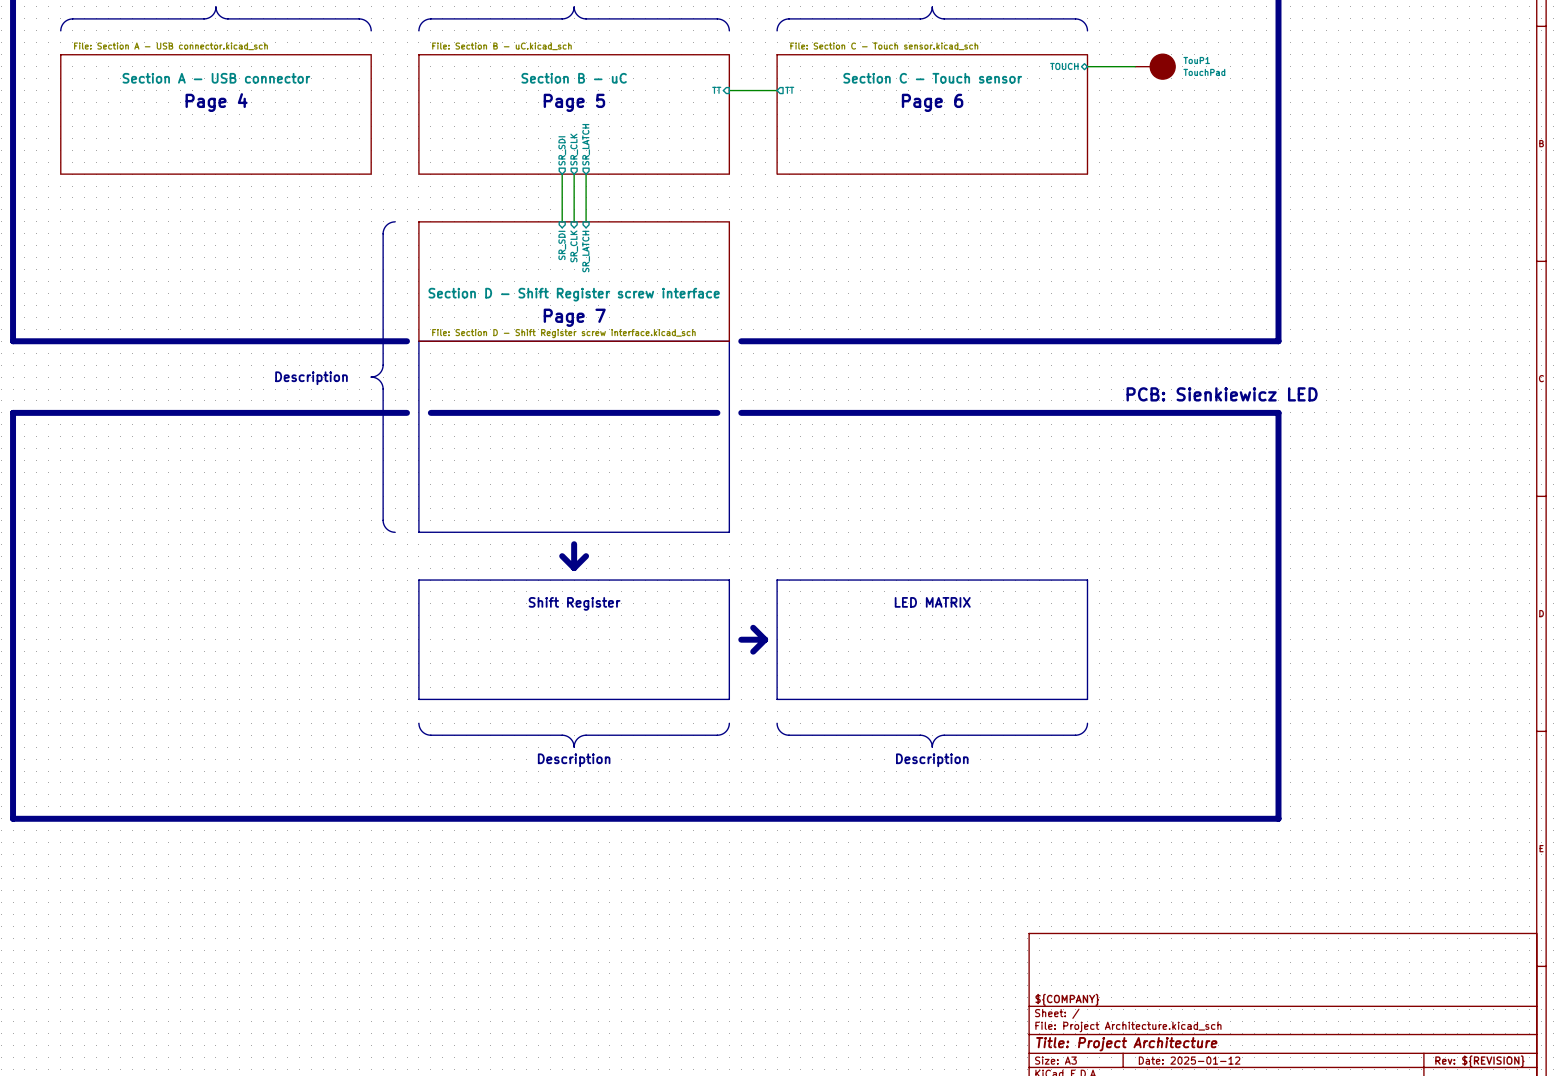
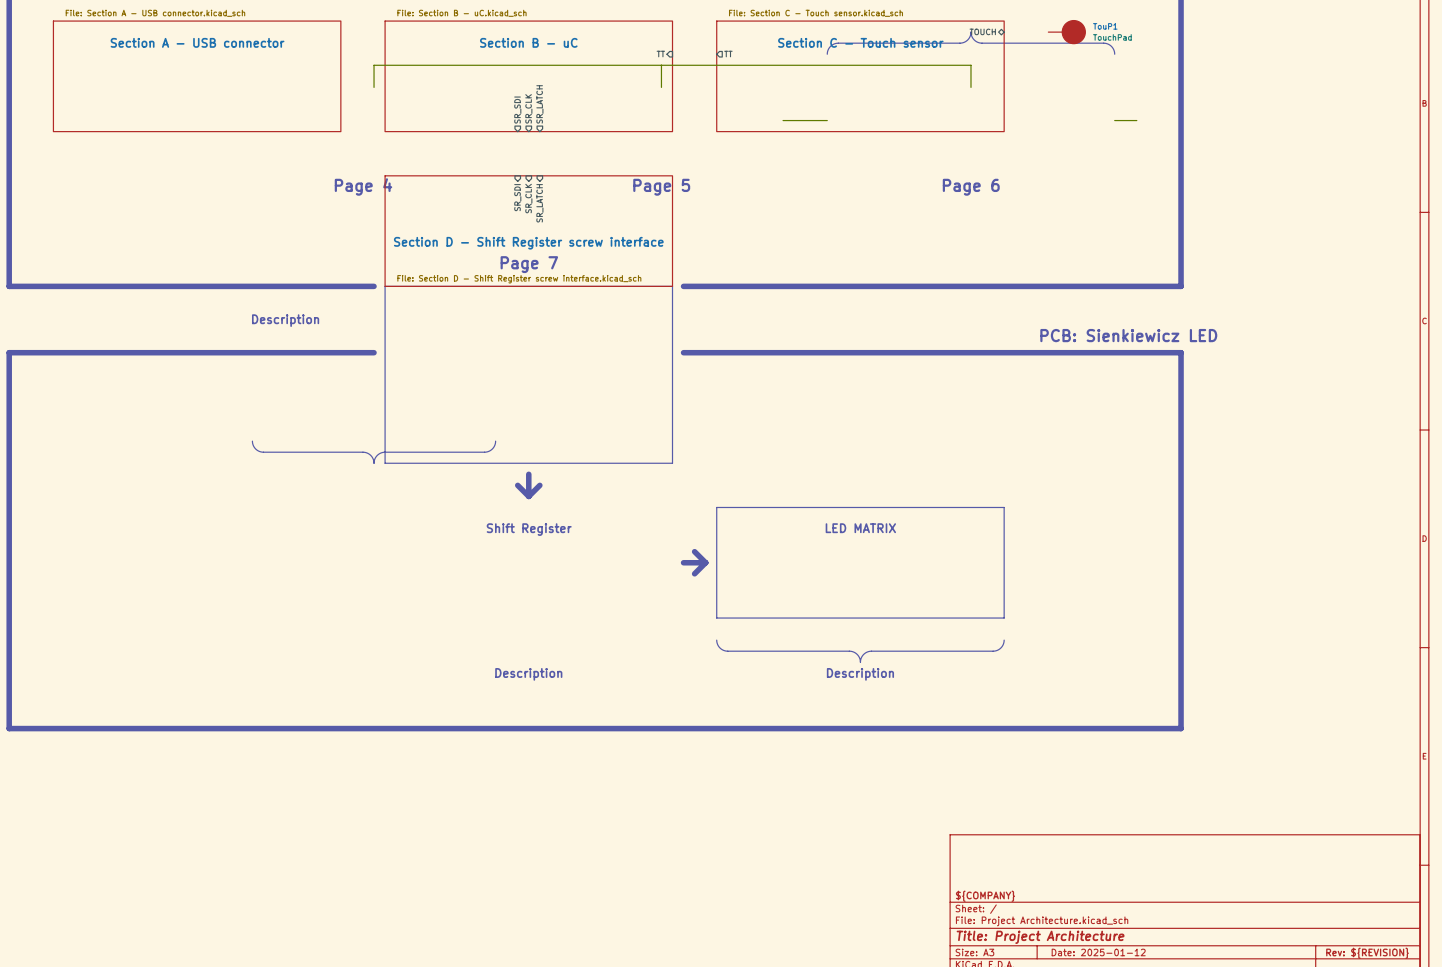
wire: (1087, 66) (1135, 66) -> none
wire: (729, 90) (777, 90) -> none
line: none -> (827, 54) (830, 46) (837, 43) (961, 43) (968, 39) (970, 32) (974, 39) (980, 43) (1104, 43) (1111, 46) (1114, 54)
text: Page 4 (216, 102) -> none
text: Page 5 (574, 102) -> none
wire: none -> (661, 65) (661, 87)
text: Page 6 (932, 102) -> none
wire: none -> (374, 87) (374, 65) (970, 65) (970, 87)
wire: none -> (783, 120) (827, 120)
wire: none -> (1114, 120) (1136, 120)
wire: (562, 174) (562, 221) -> none
wire: (574, 174) (574, 221) -> none
wire: (586, 174) (586, 221) -> none
line: (395, 221) (387, 224) (383, 232) (383, 366) (378, 374) (371, 377) (378, 379) (383, 387) (383, 521) (386, 528) (395, 532) -> none
text: none -> Page 4 (363, 186)
text: none -> Page 5 (661, 187)
text: none -> Page 6 (971, 187)
line: (430, 412) (717, 412) -> none
line: none -> (252, 441) (255, 448) (262, 452) (365, 452) (371, 456) (374, 463) (376, 456) (383, 452) (487, 451) (493, 448) (495, 441)
line: (418, 580) (729, 580) (729, 699) (418, 699) (418, 580) -> none
line: (418, 723) (422, 731) (429, 735) (563, 735) (570, 738) (574, 747) (576, 739) (584, 735) (718, 735) (726, 730) (729, 723) -> none

